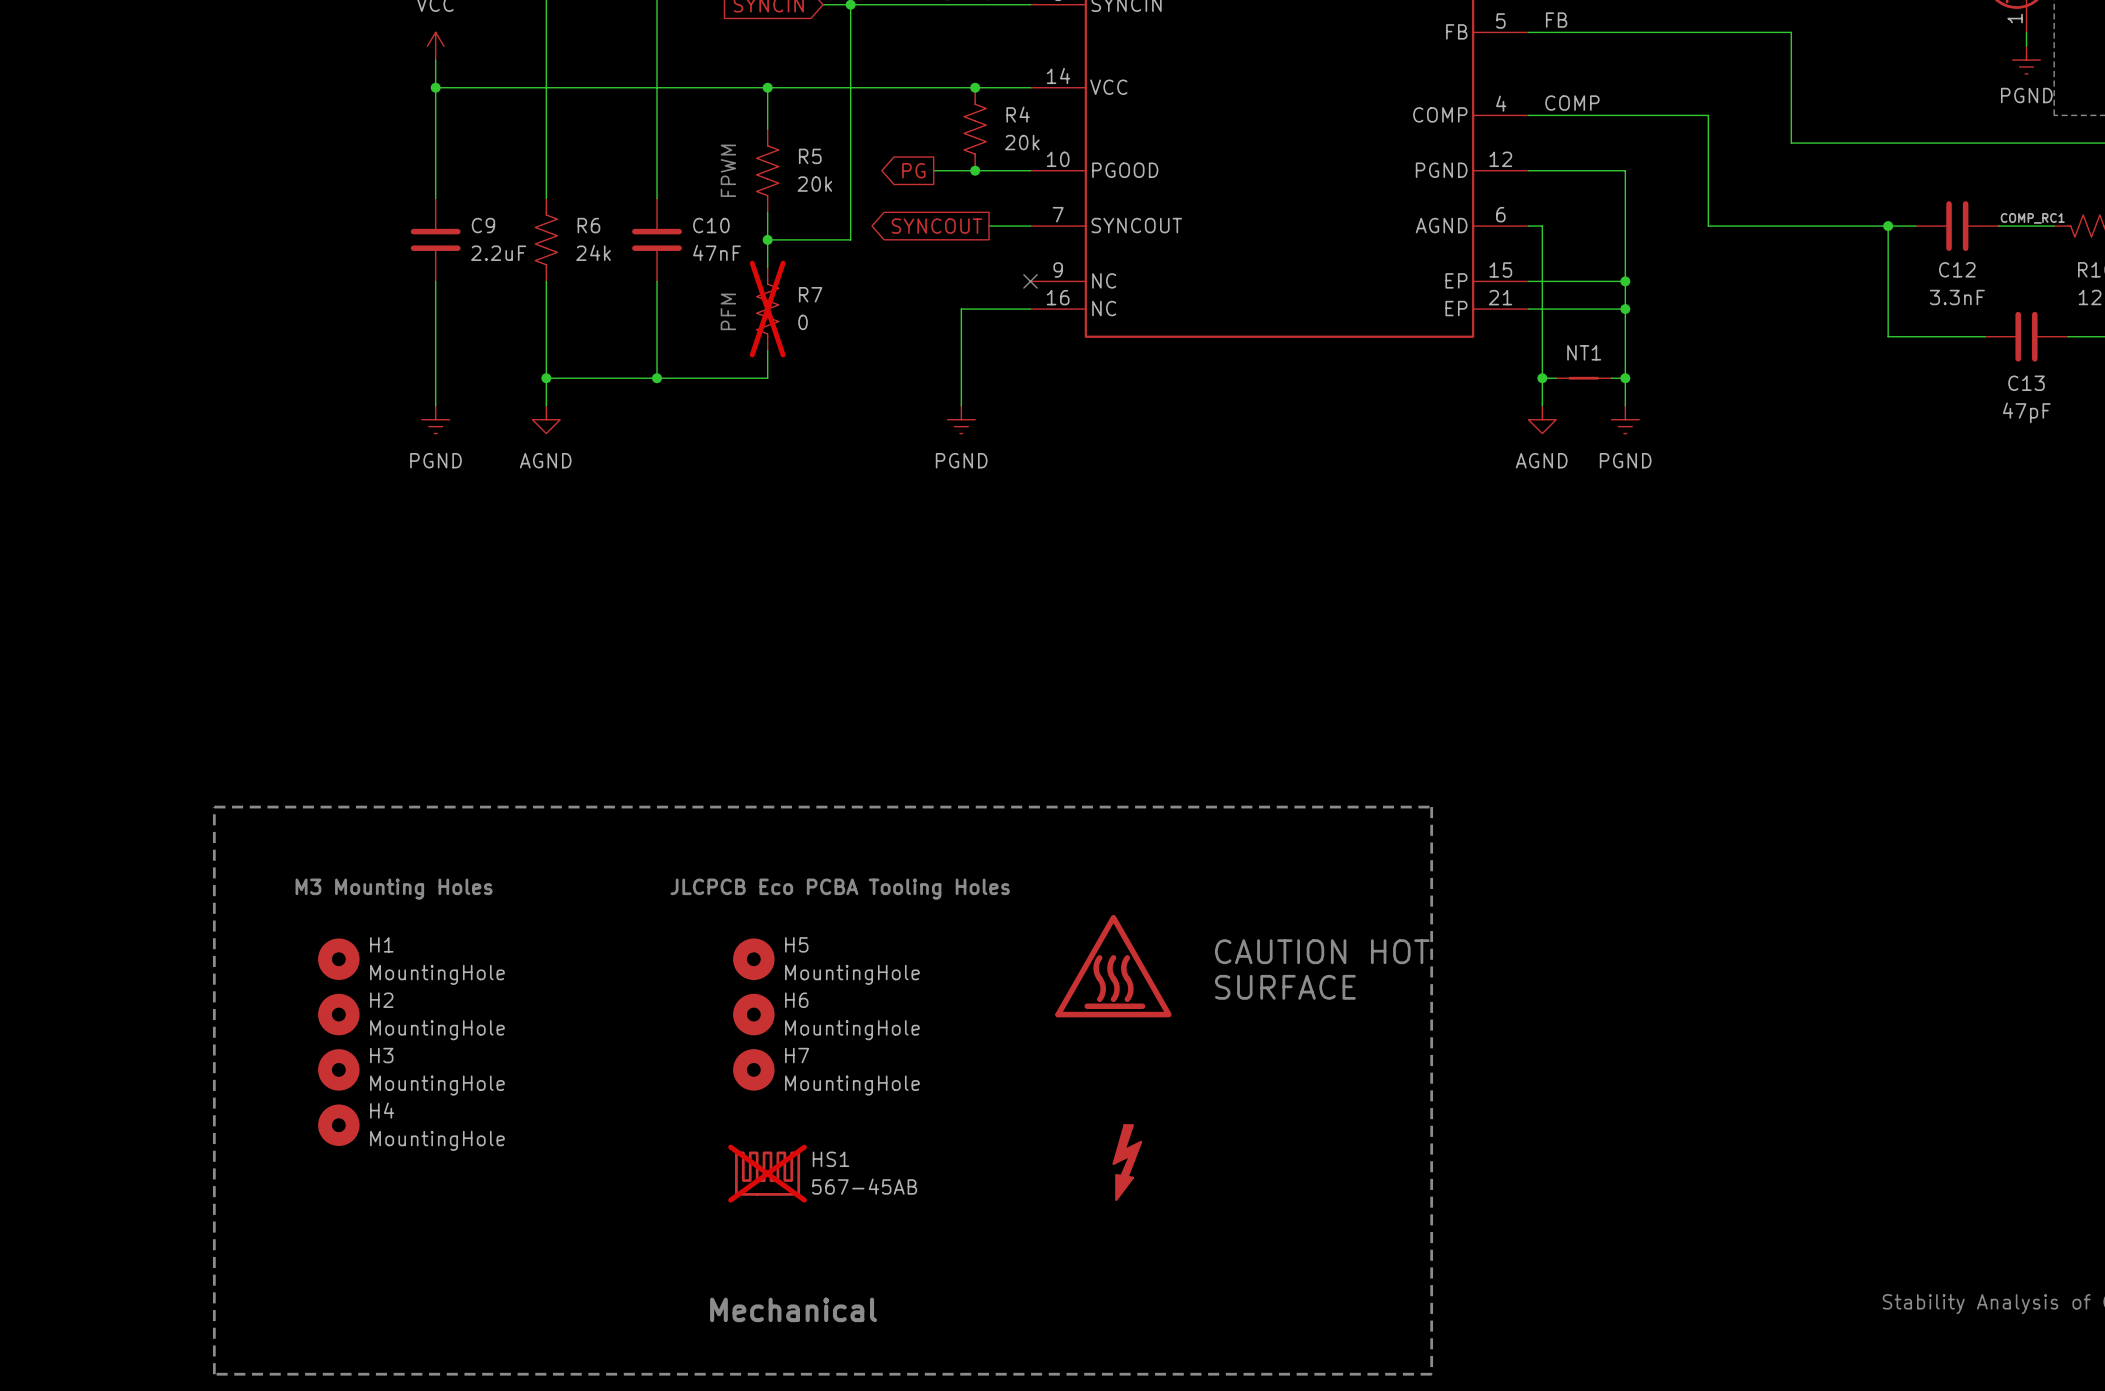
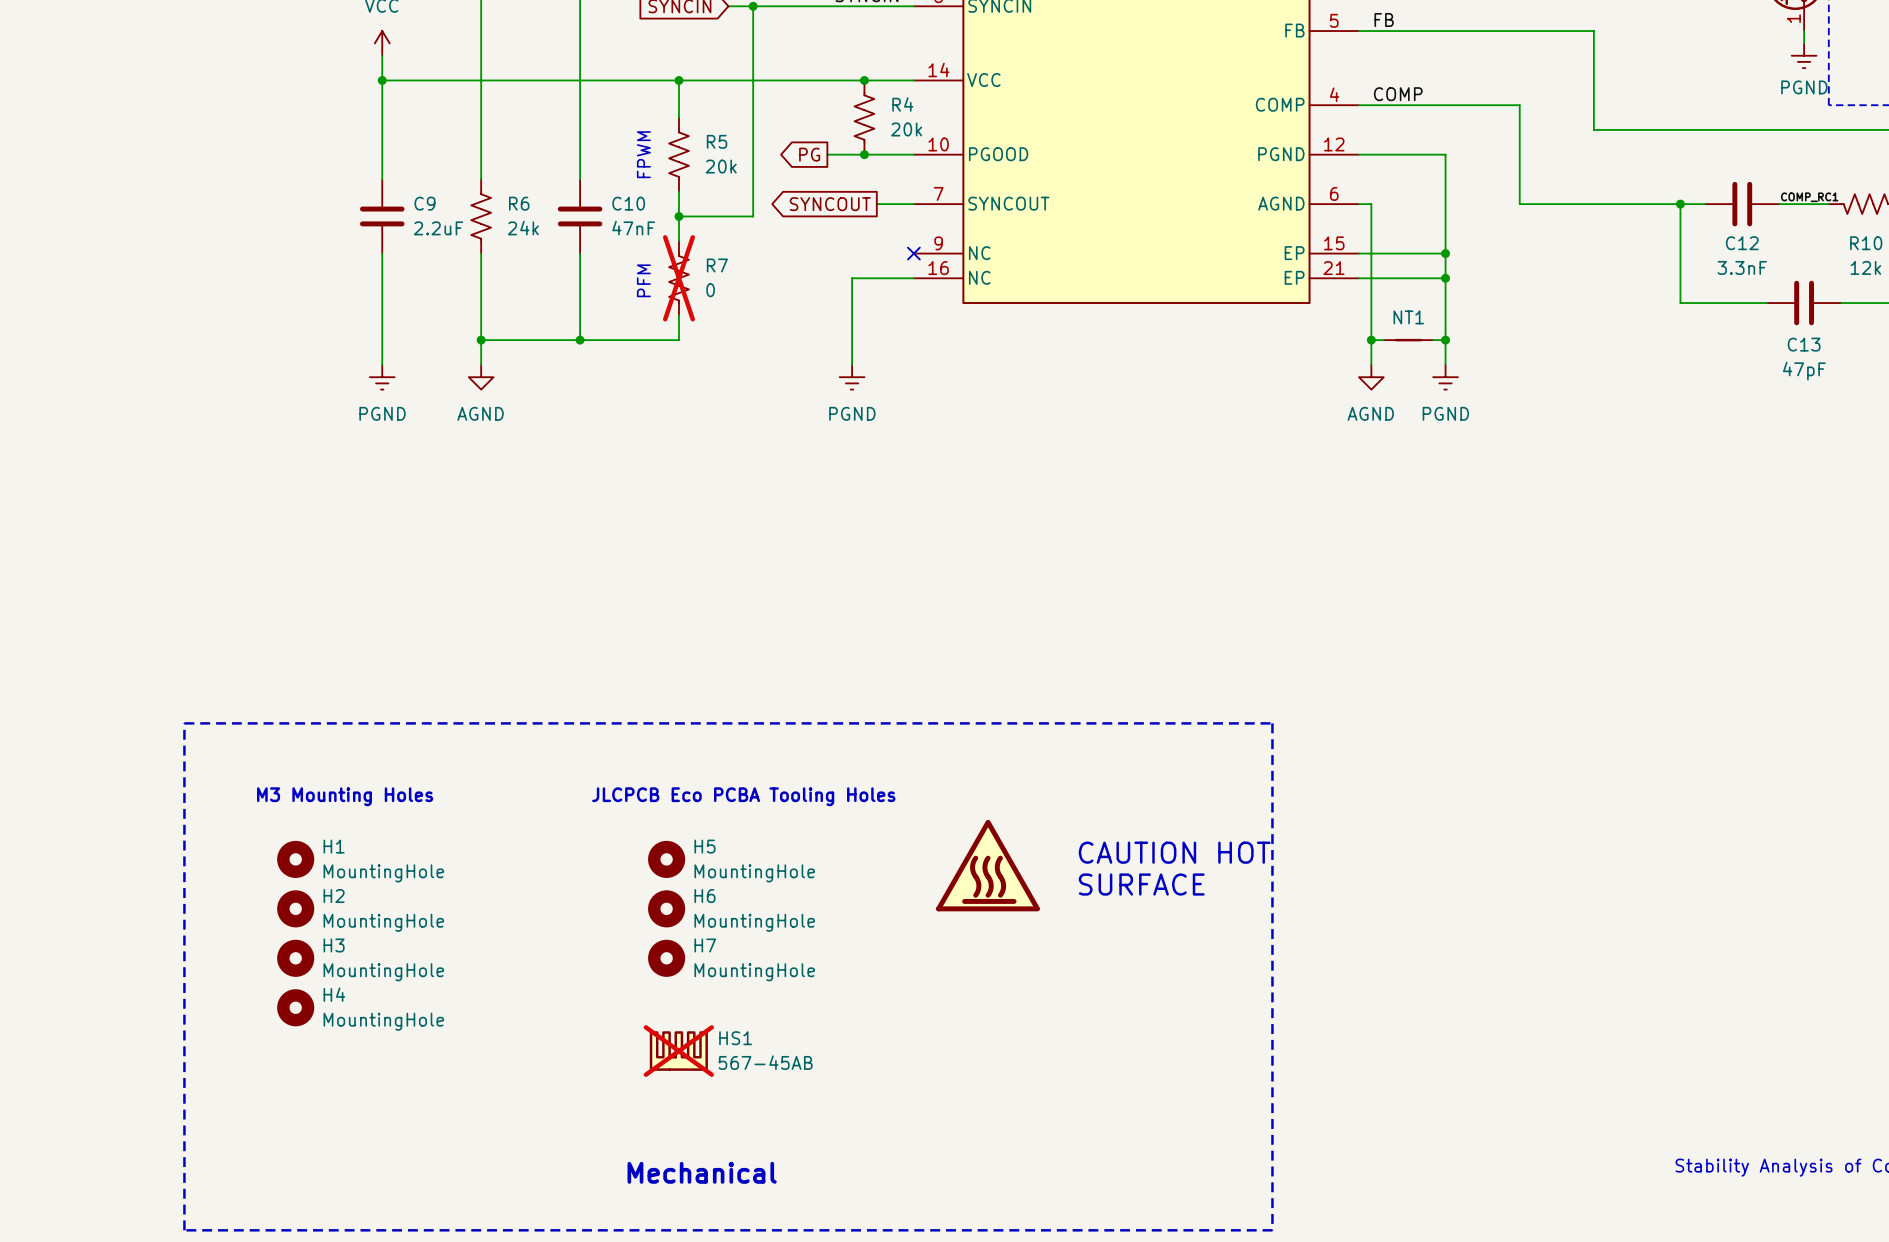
power symbol: (1127, 1162) -> none

